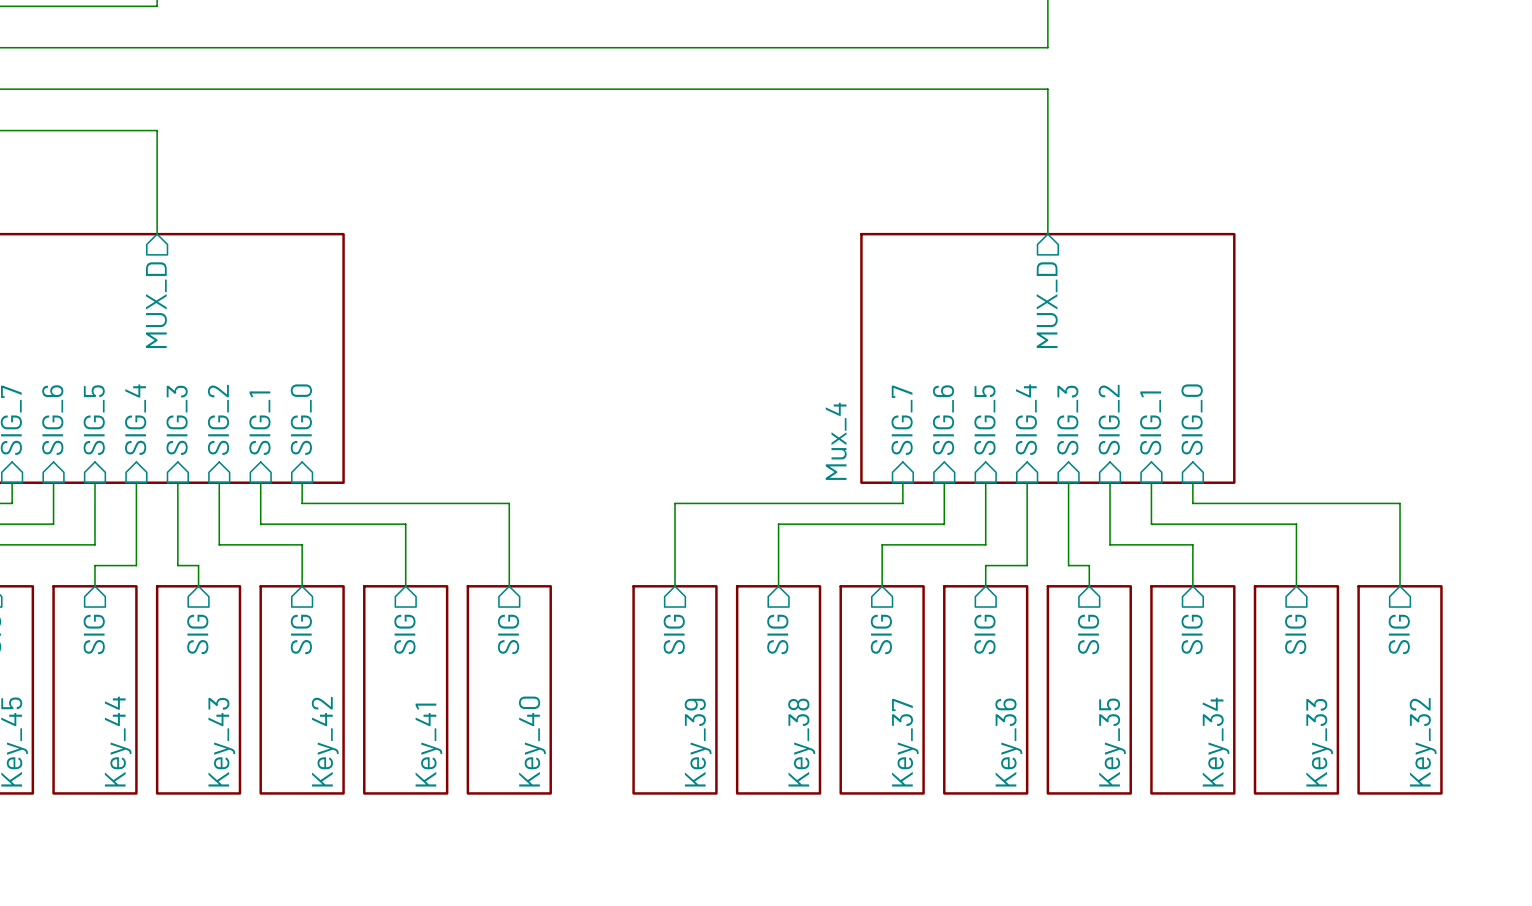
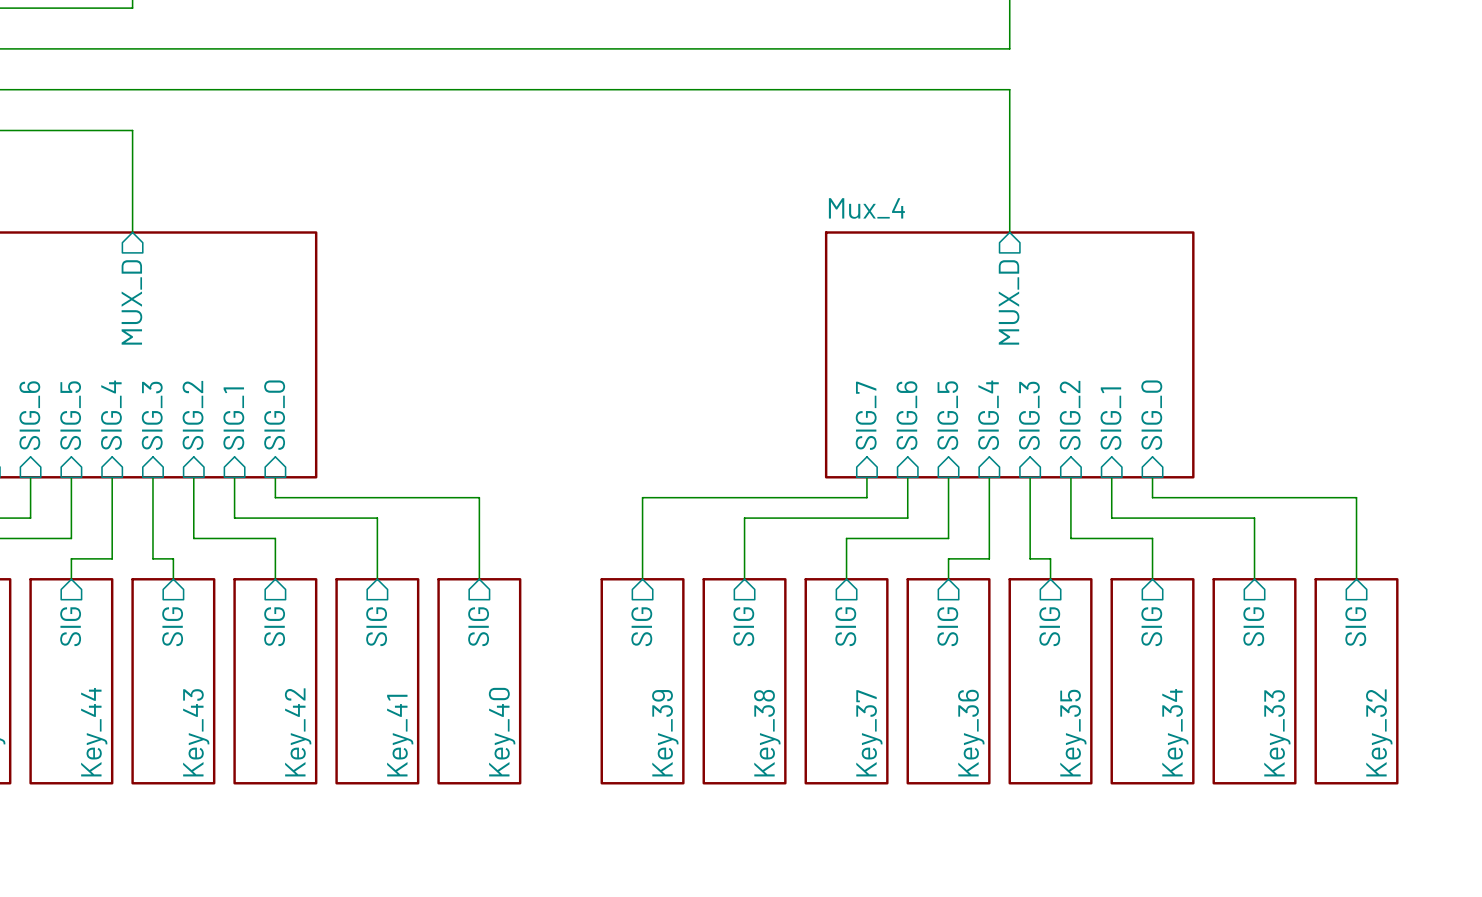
sheet Mux_4 name rotation: 0° (836, 441) -> 90° clockwise (866, 208)
sheet Mux_4 name position: Mux_4 (836, 441) -> Mux_4 (866, 208)

